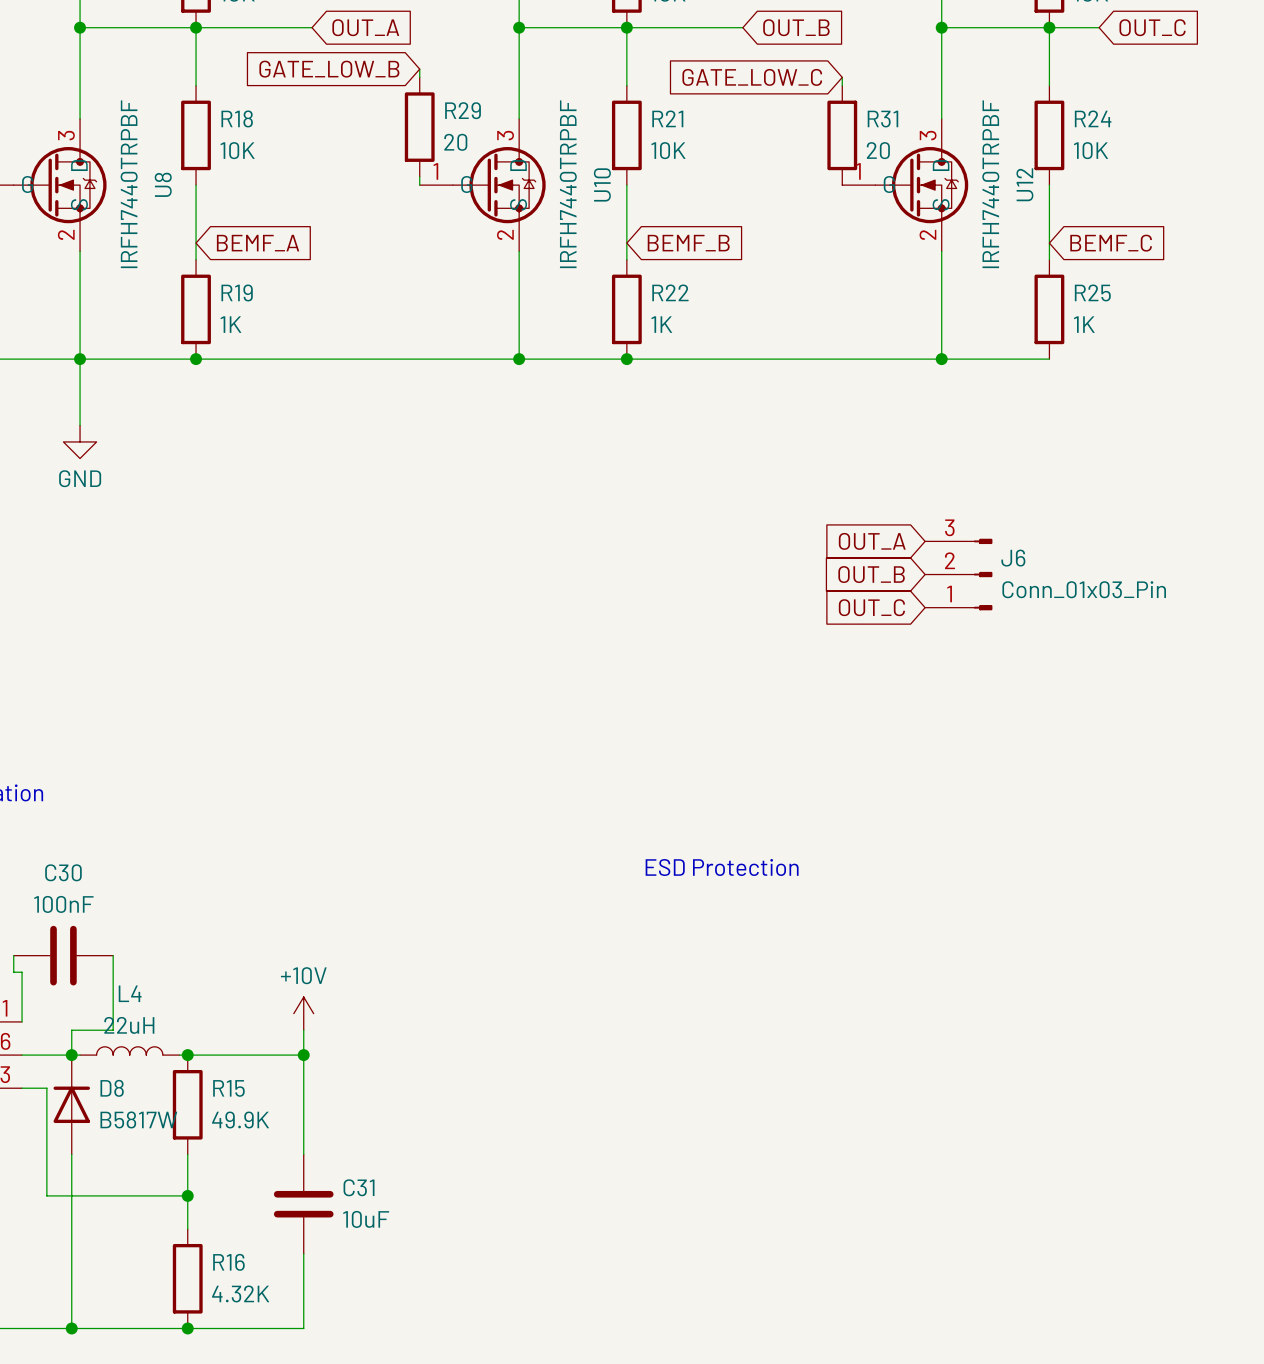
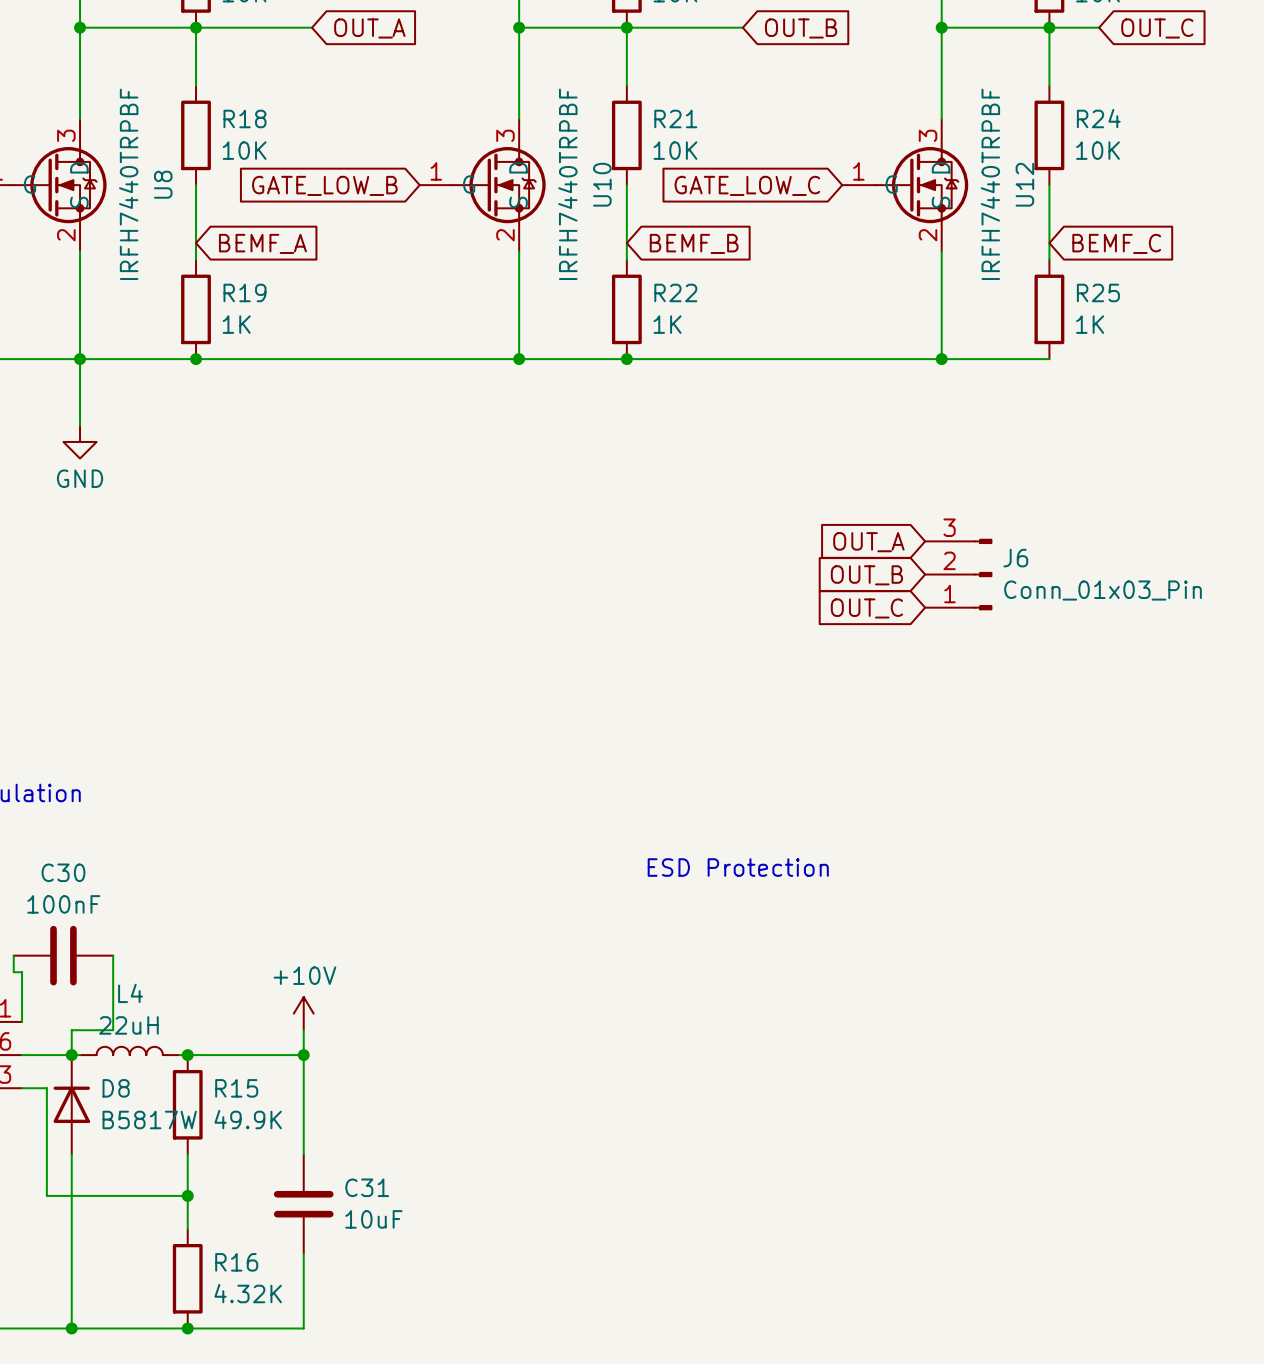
global label position: GATE_LOW_B (329, 69) -> GATE_LOW_B (324, 185)
wire: (419, 69) (419, 77) -> none
global label position: GATE_LOW_C (752, 77) -> GATE_LOW_C (747, 185)
wire: (842, 77) (842, 85) -> none
R29: 20 (419, 127) -> none
R31: 20 (842, 135) -> none
wire: (419, 176) (419, 185) -> none

